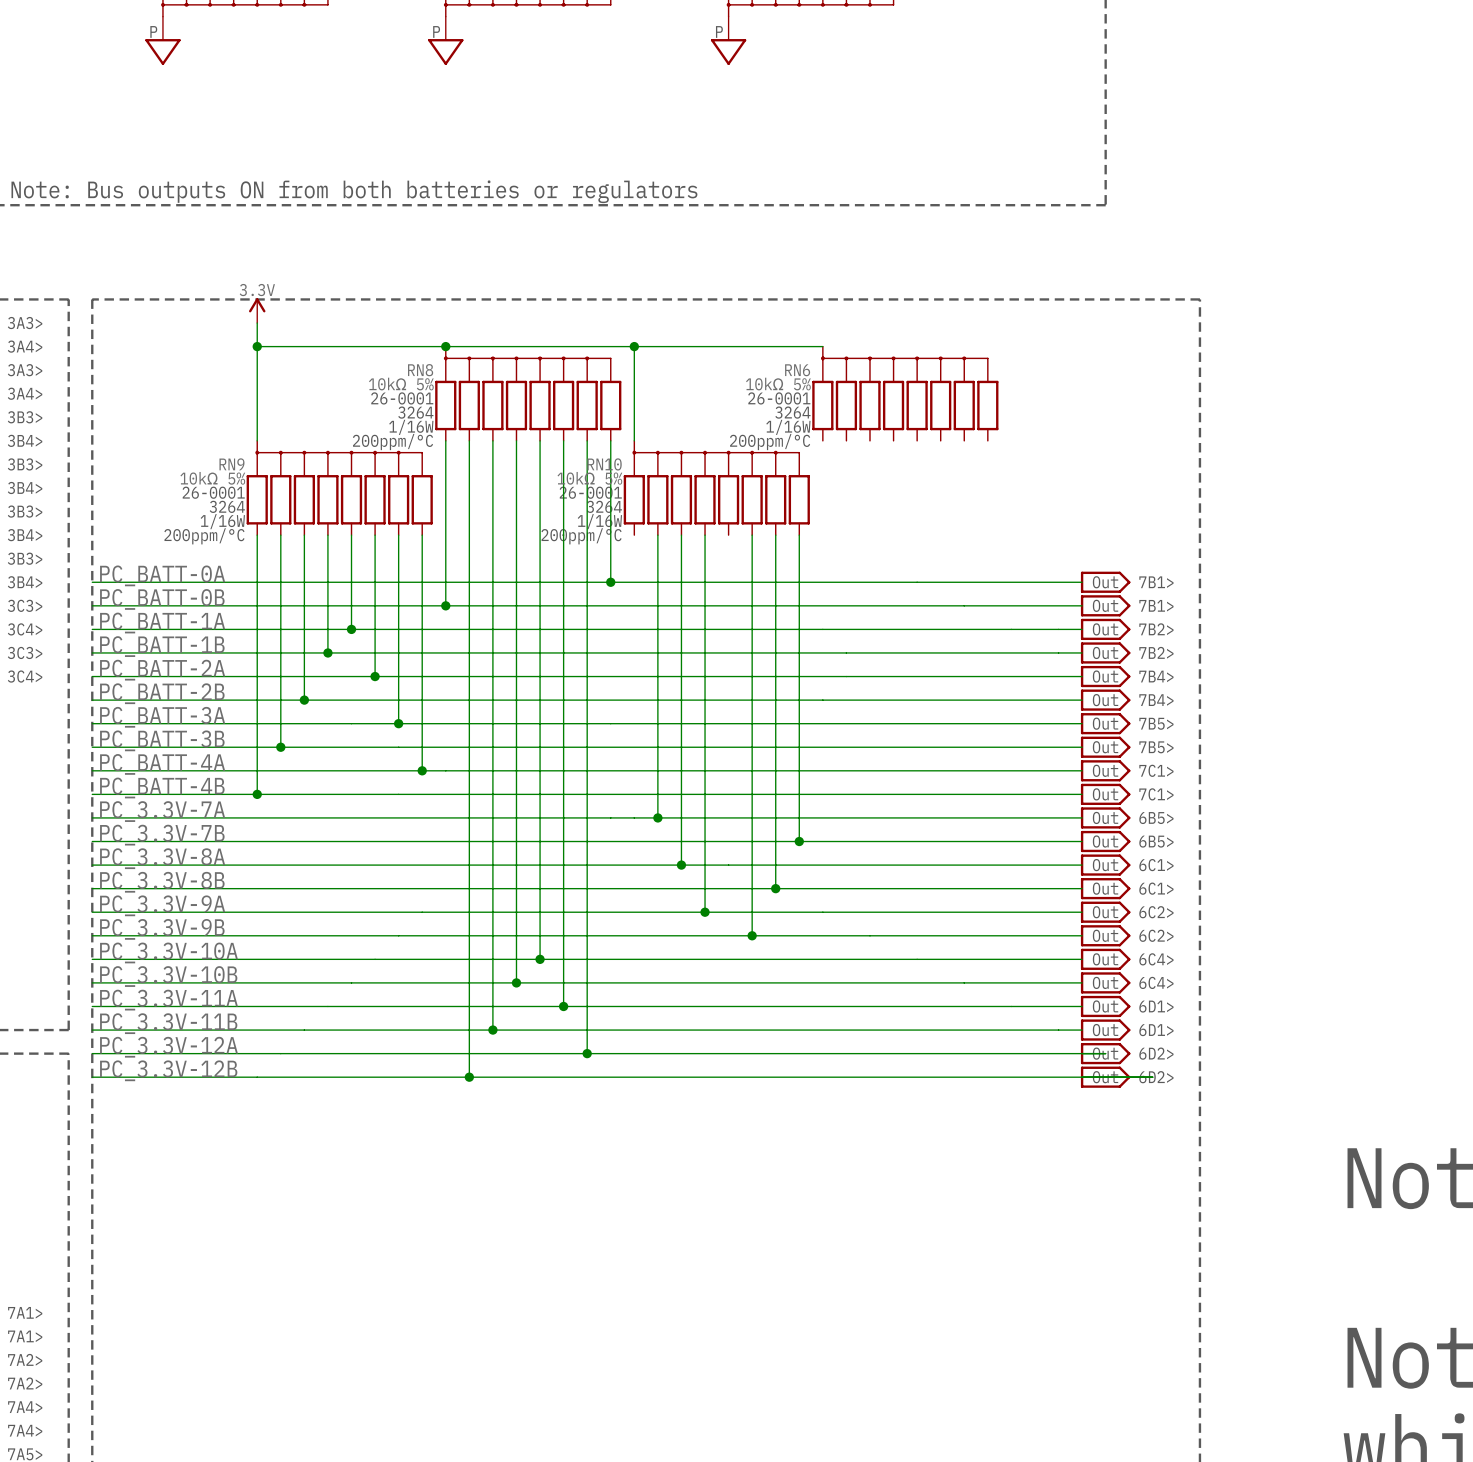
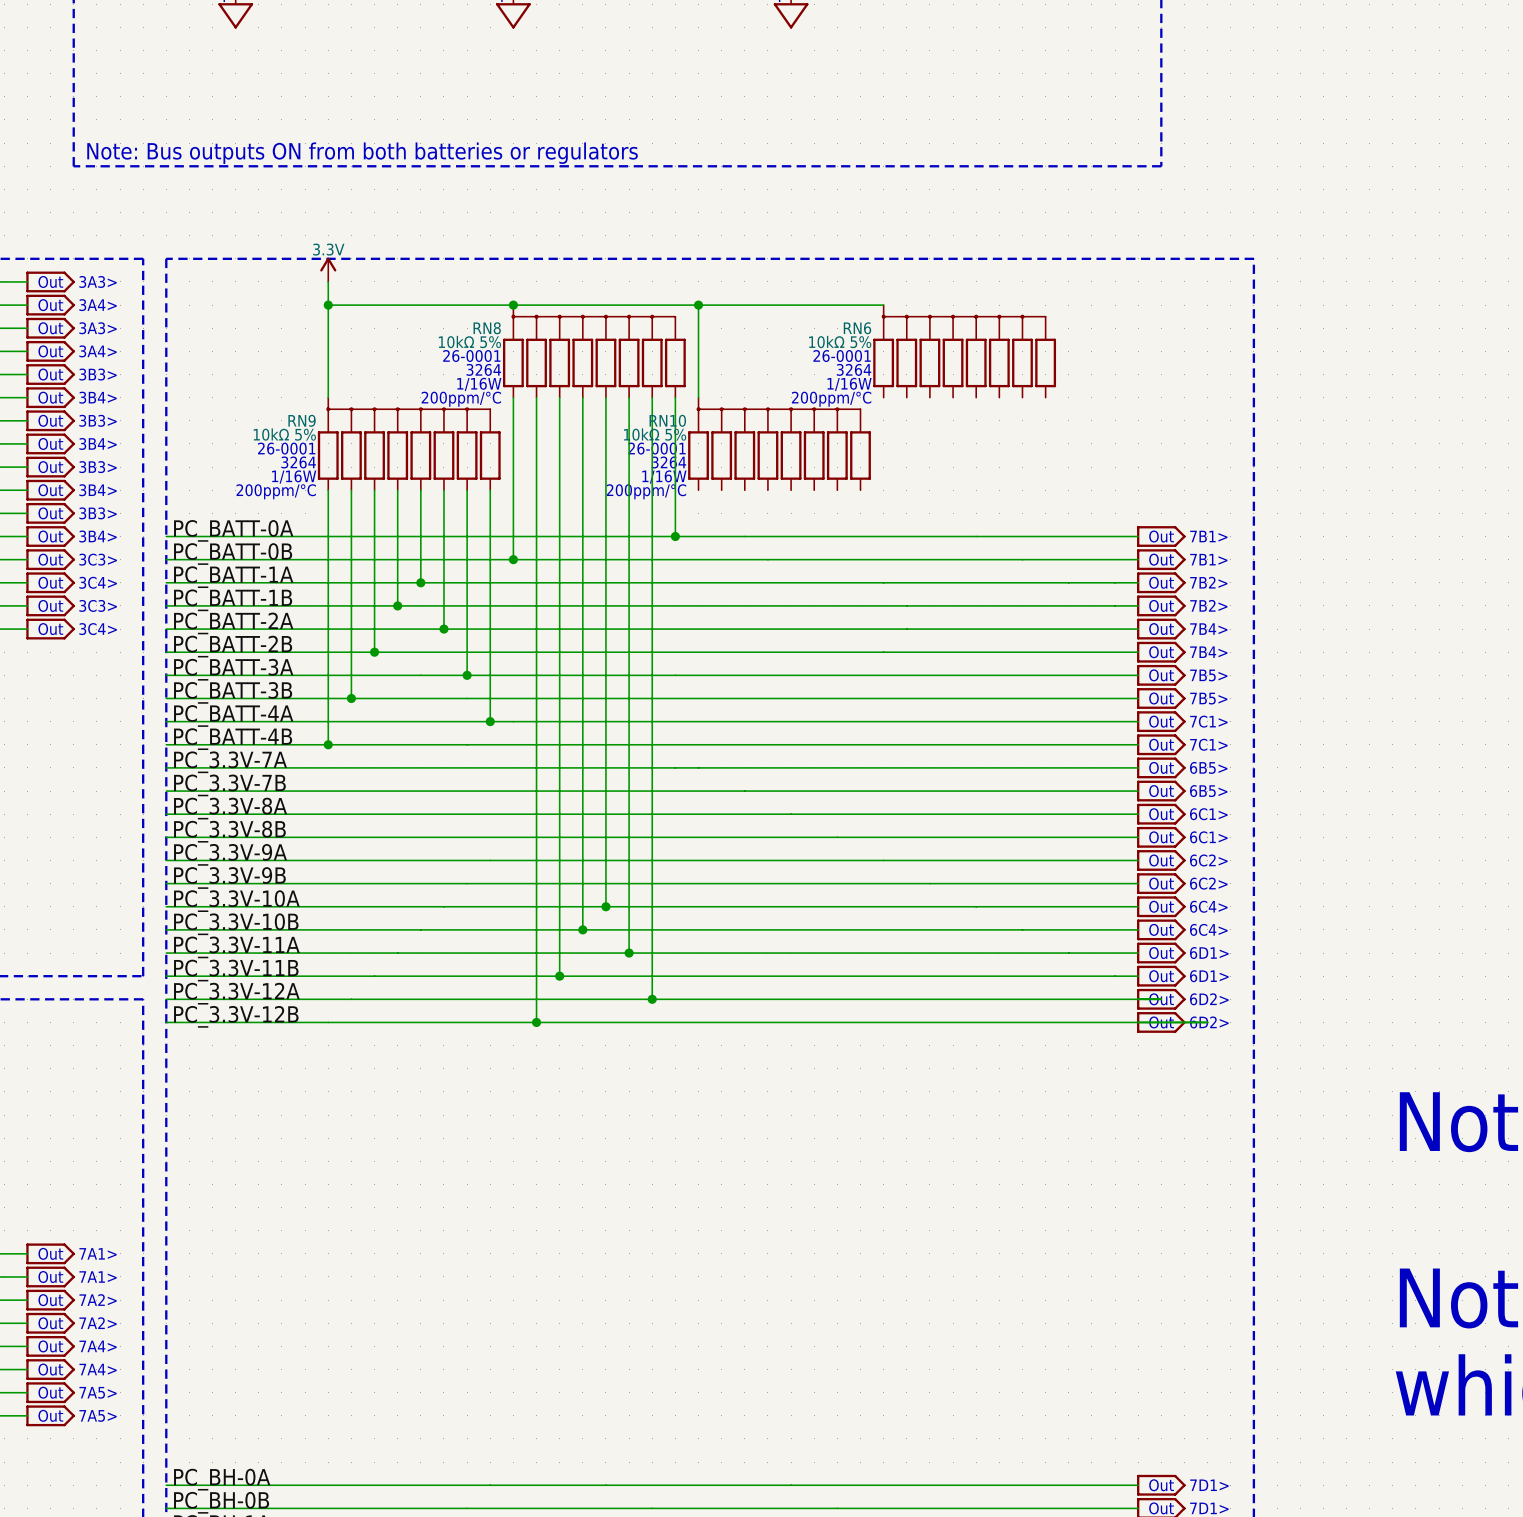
wire: (657, 535) (657, 817) -> none
wire: (681, 535) (681, 865) -> none
wire: (705, 535) (705, 912) -> none
wire: (752, 535) (752, 935) -> none
wire: (775, 535) (775, 888) -> none
wire: (799, 535) (799, 841) -> none
junction: (657, 817) -> none
junction: (799, 841) -> none
junction: (681, 865) -> none
junction: (775, 888) -> none
junction: (705, 912) -> none
junction: (752, 935) -> none

